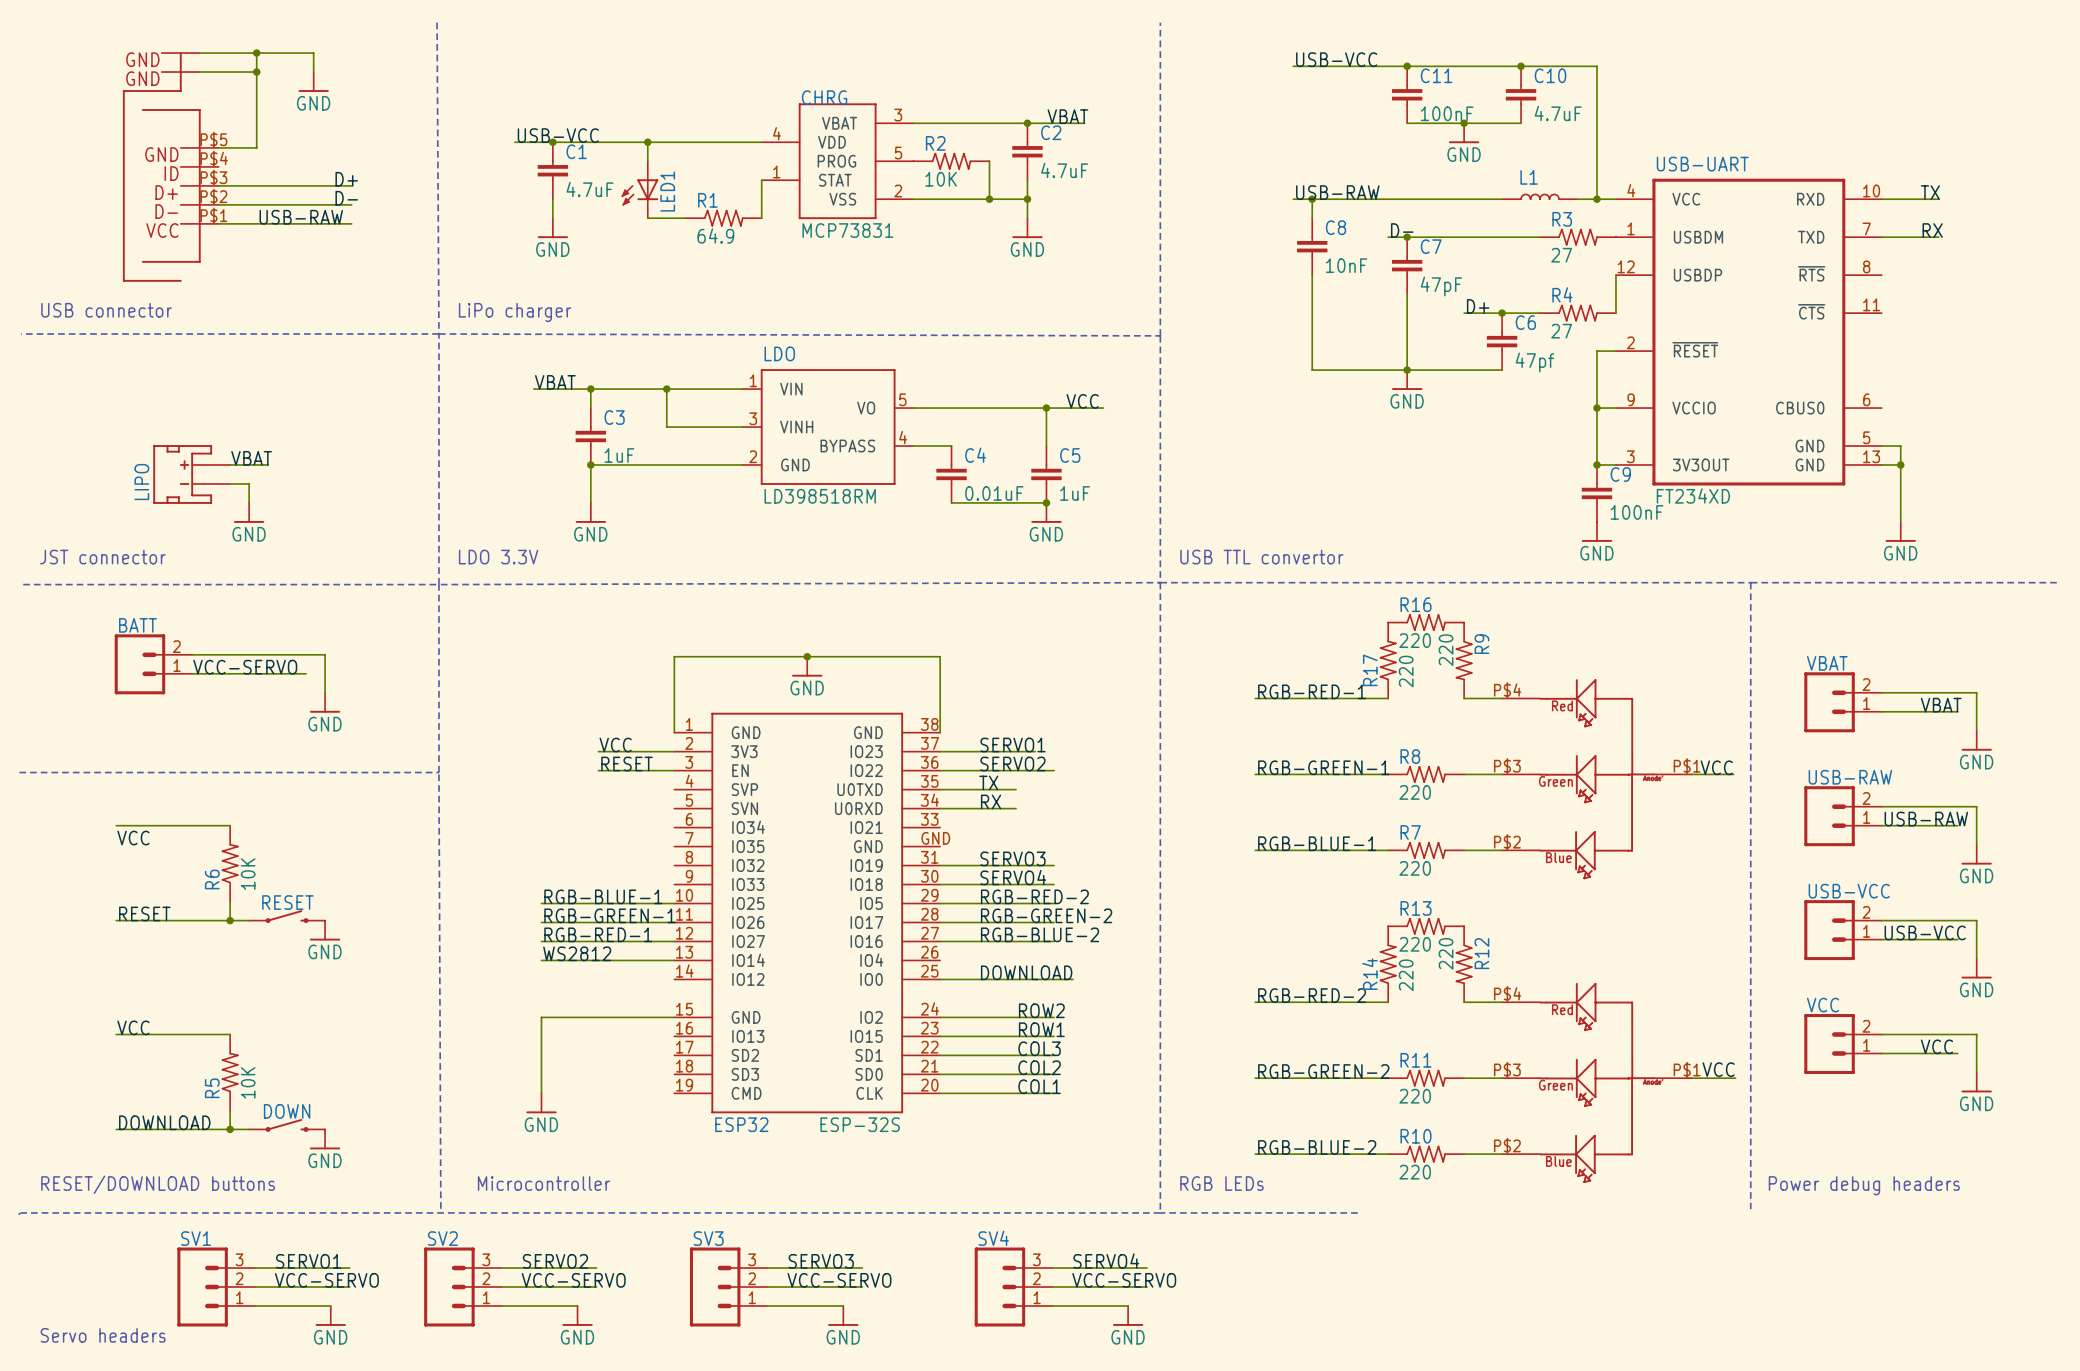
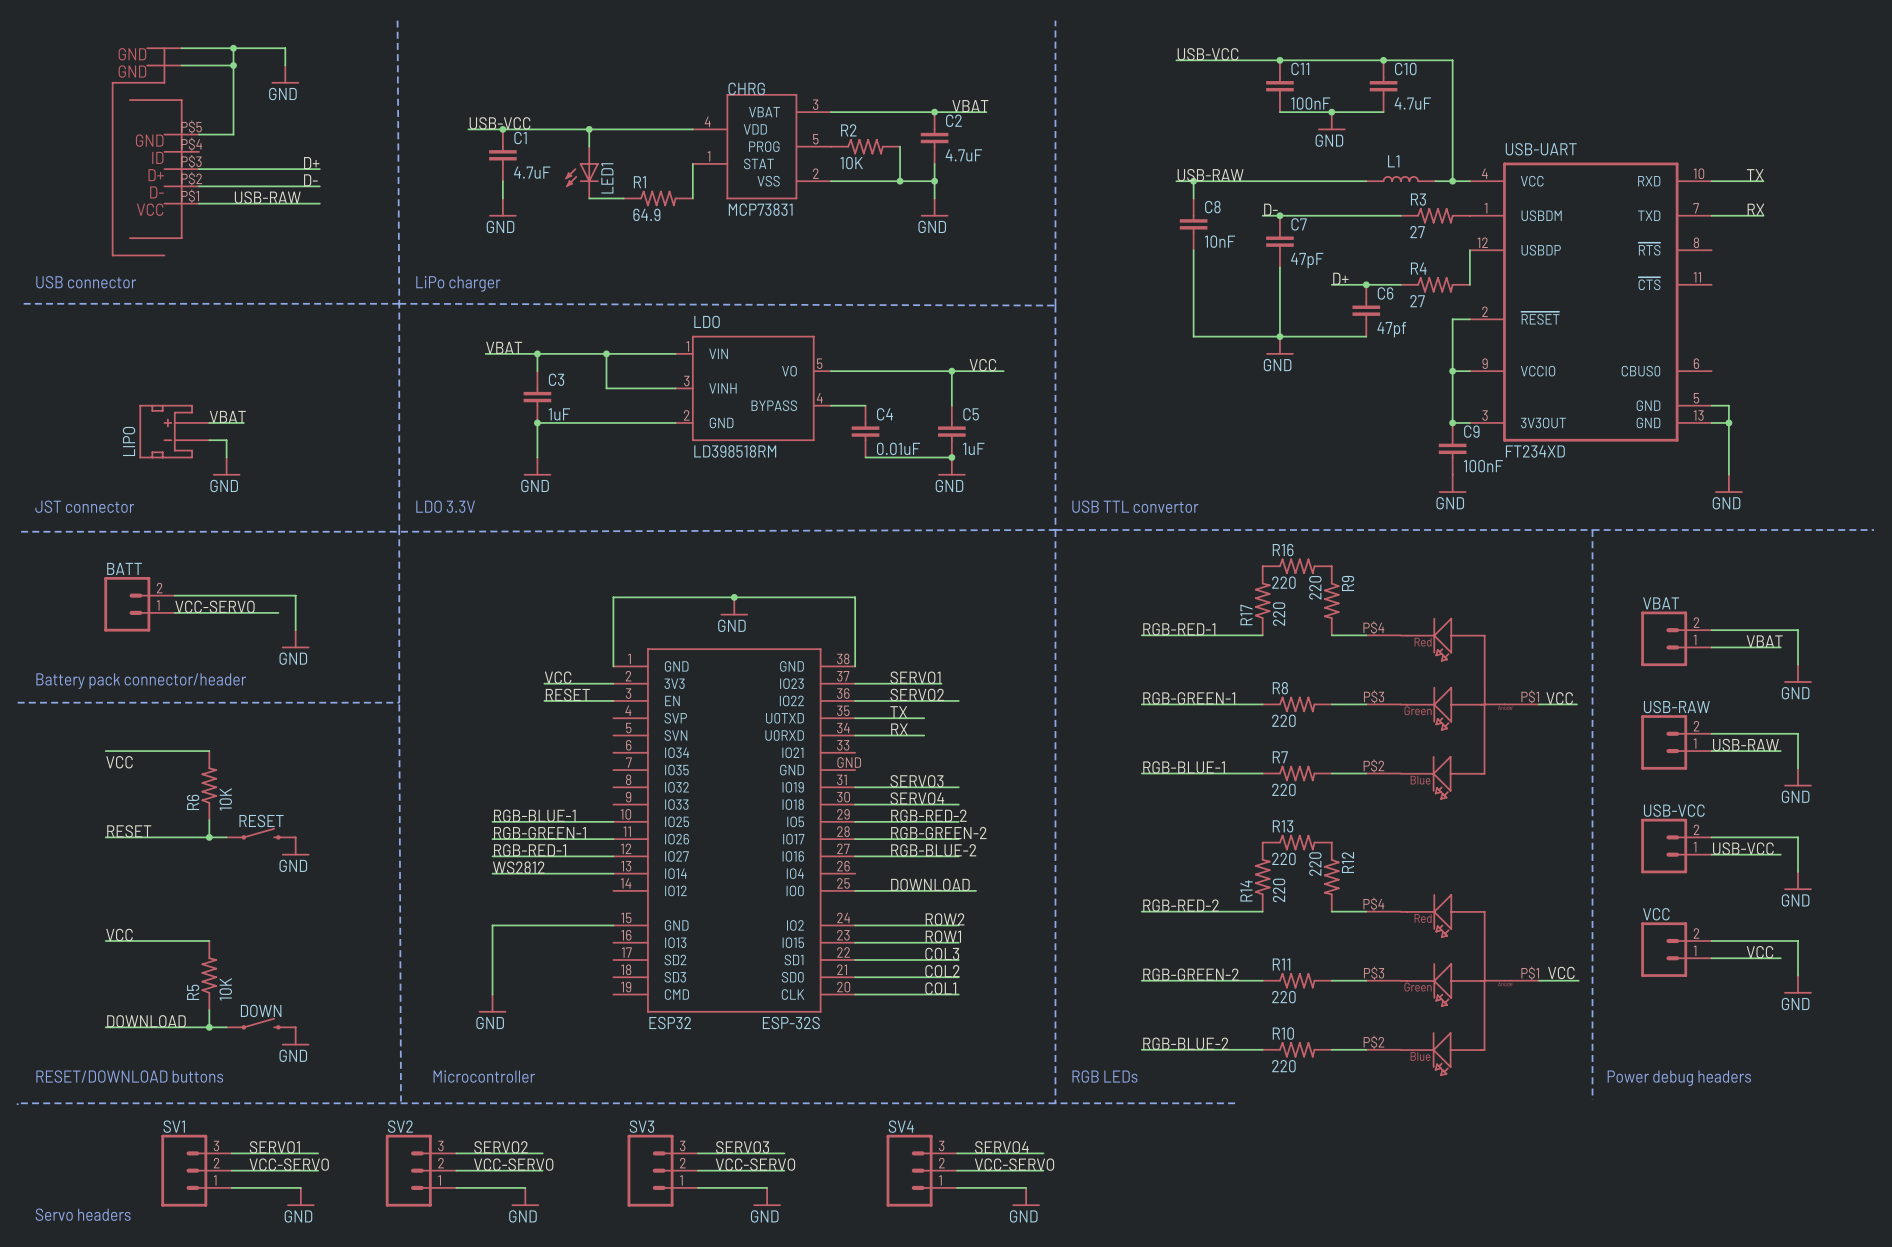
text: none -> Battery pack connector/header (141, 681)

